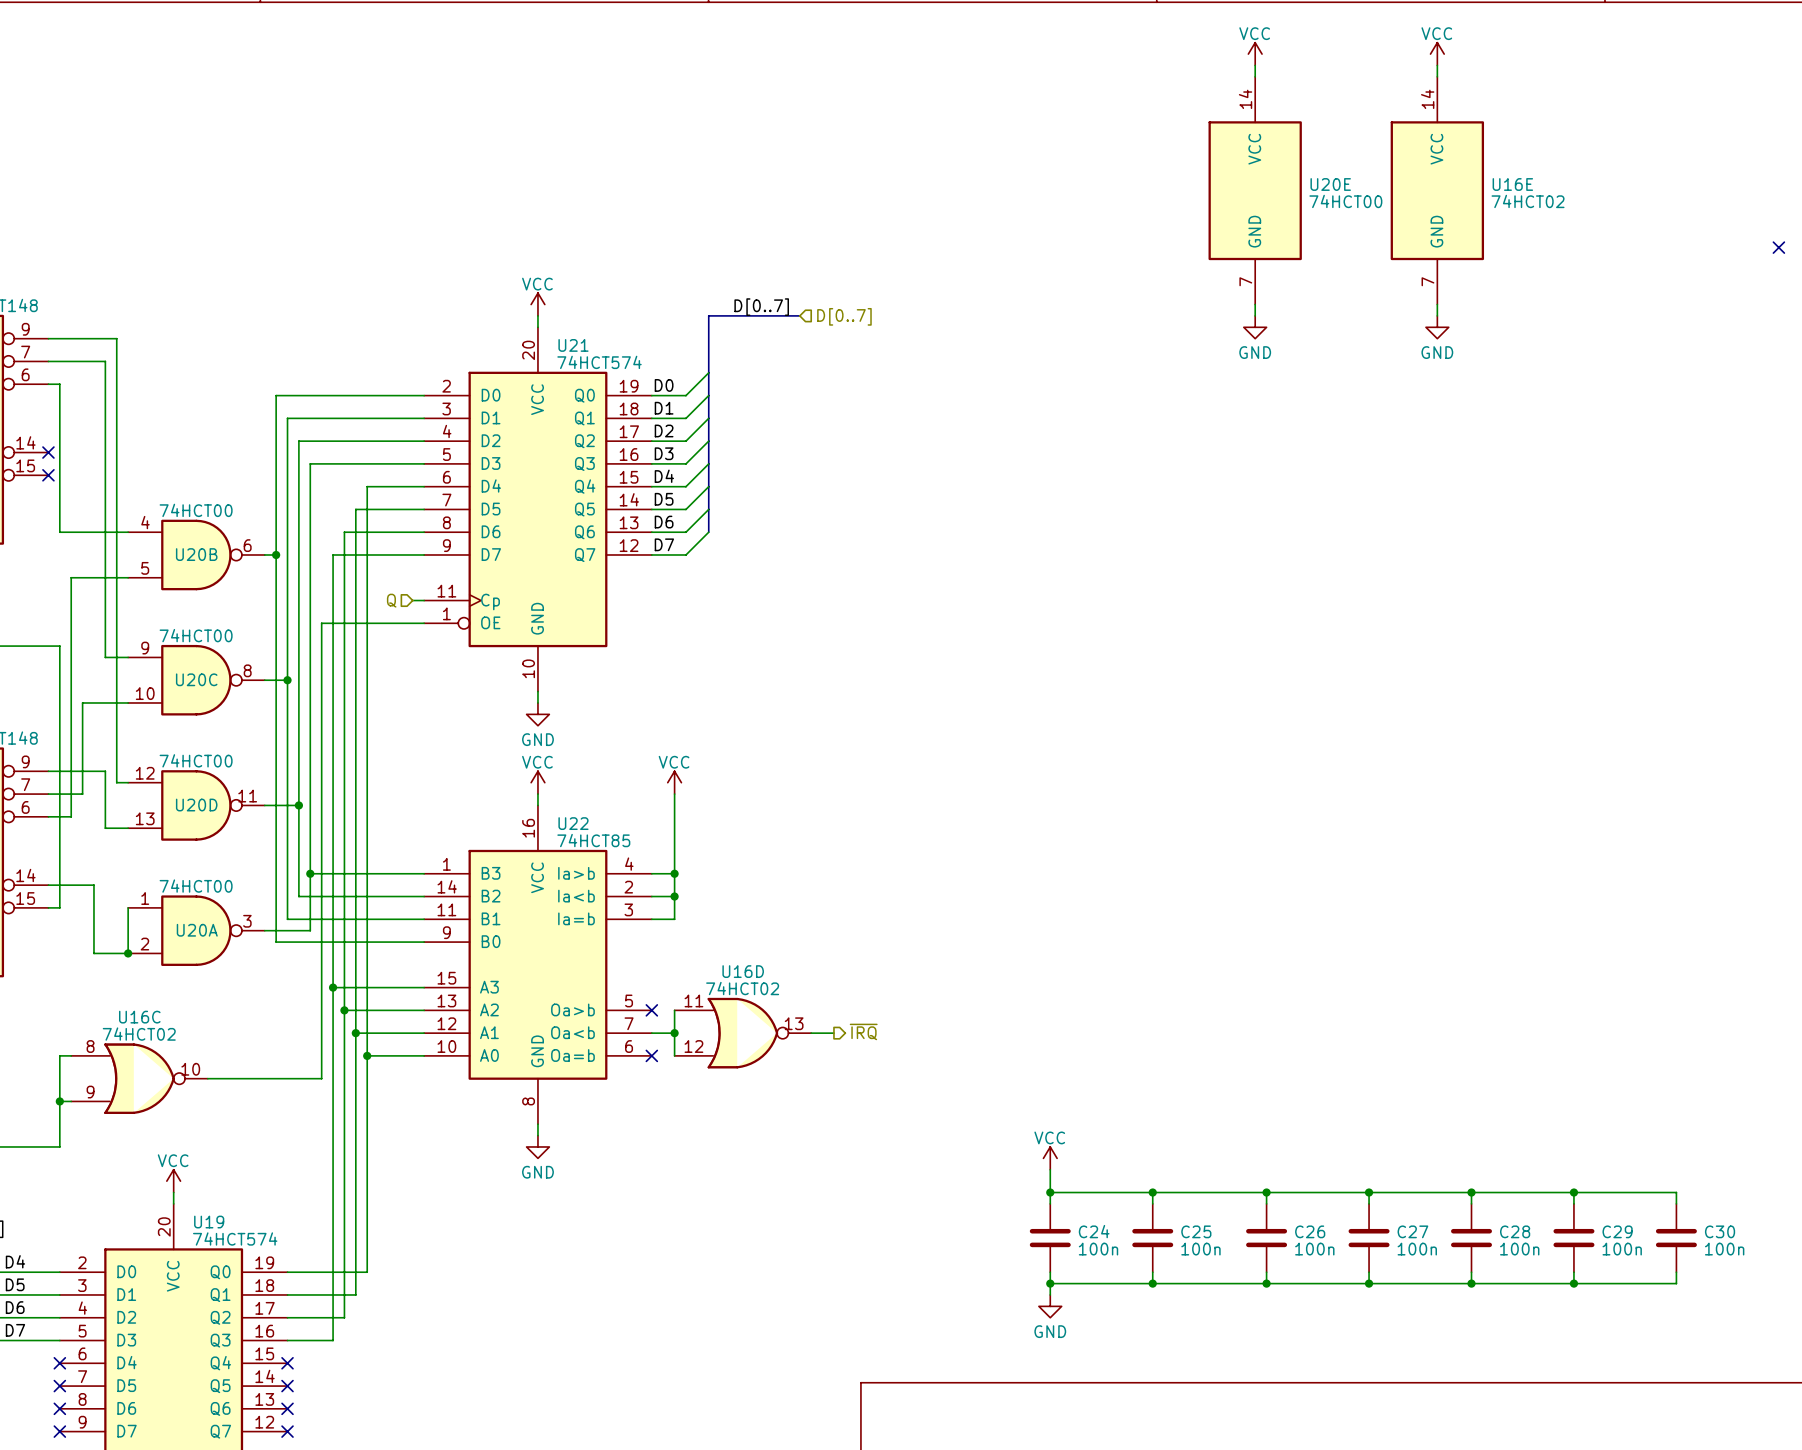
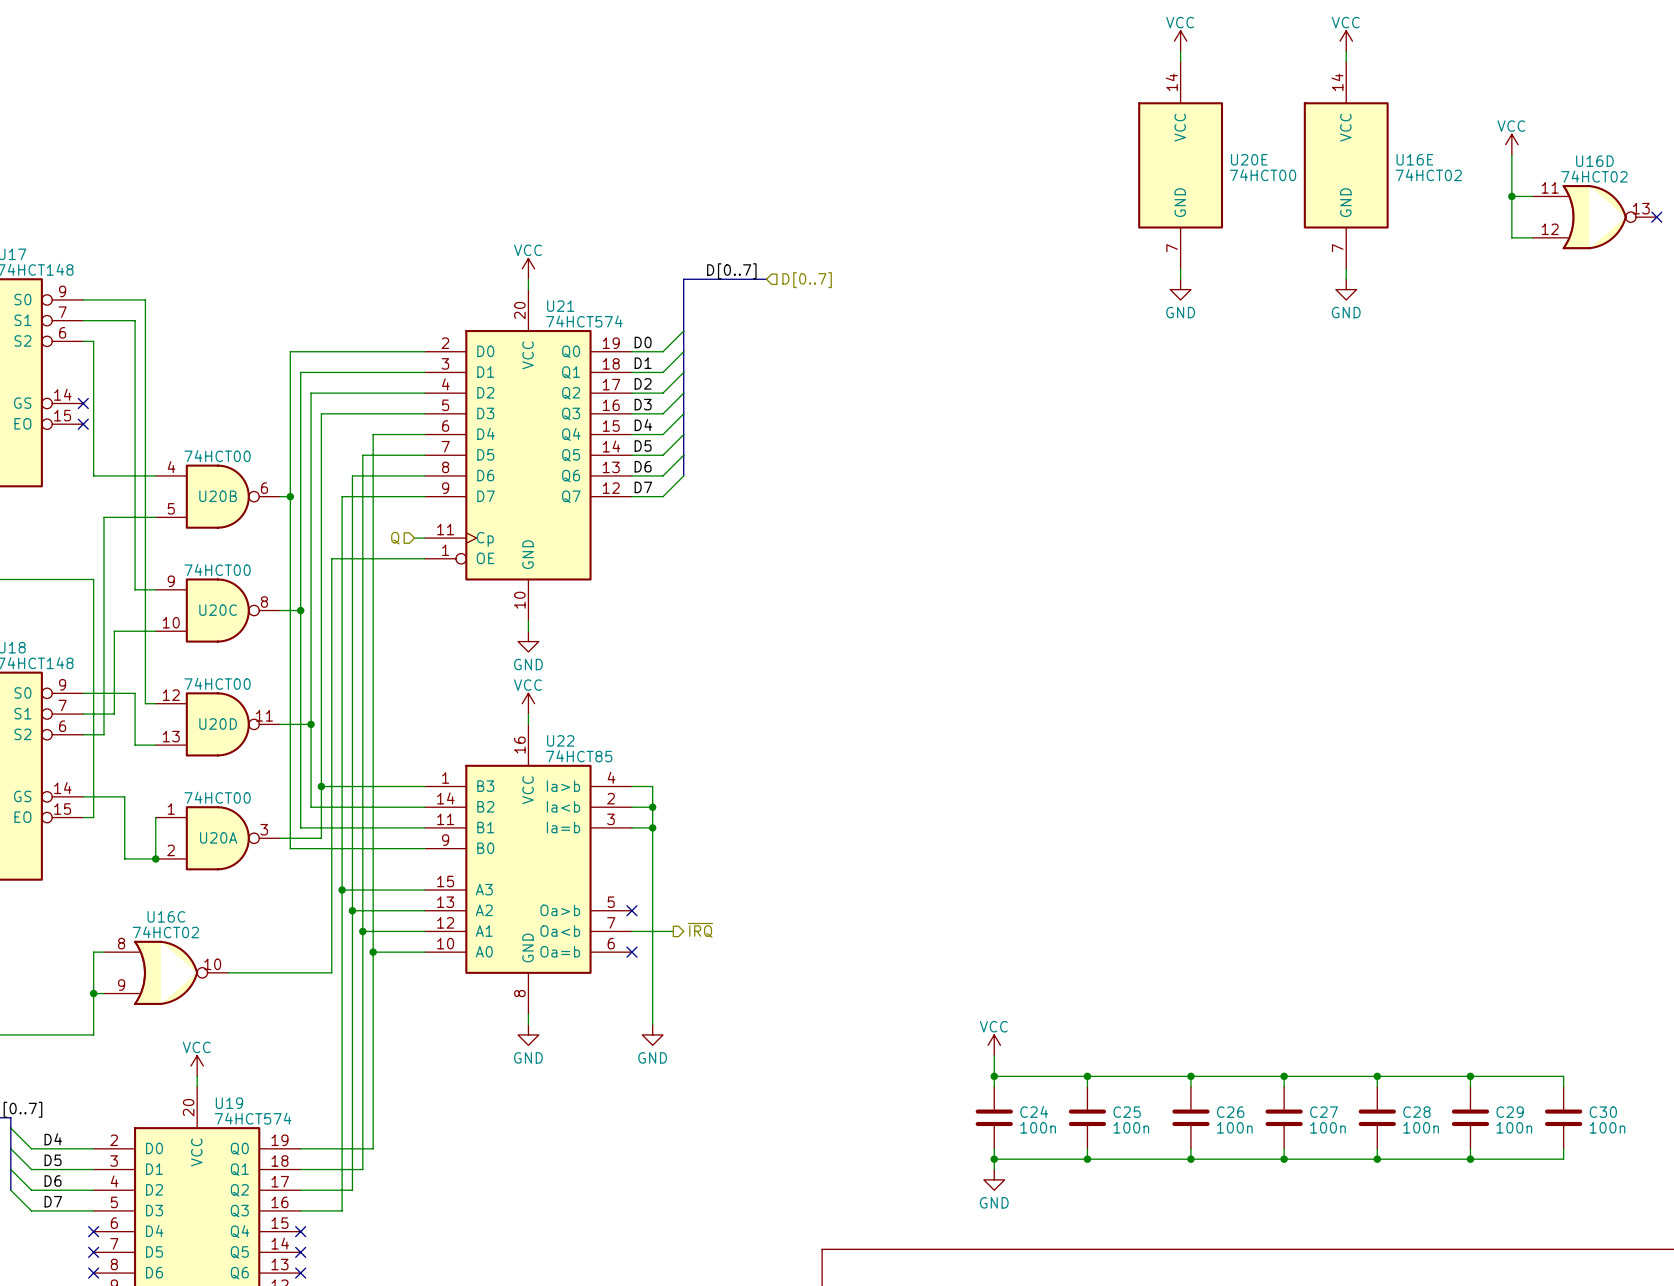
power symbol: none -> VCC (1511, 144)
wire: none -> (1511, 155) (1511, 237) (1532, 237)
wire: none -> (1511, 196) (1532, 196)
junction: none -> (1511, 196)
power symbol: VCC (674, 782) -> none
wire: (674, 794) (674, 873) -> none
junction position: (674, 873) -> (652, 827)
wire: none -> (652, 827) (652, 910)
hierarchical label position: ~{IRQ} (863, 1031) -> ~{IRQ} (700, 930)
junction: (674, 1033) -> none
U16D position: (742, 1033) -> (1594, 217)
wire: (811, 1033) (833, 1033) -> (652, 931) (673, 931)
wire: none -> (652, 952) (652, 1024)
power symbol: none -> GND (652, 1034)

